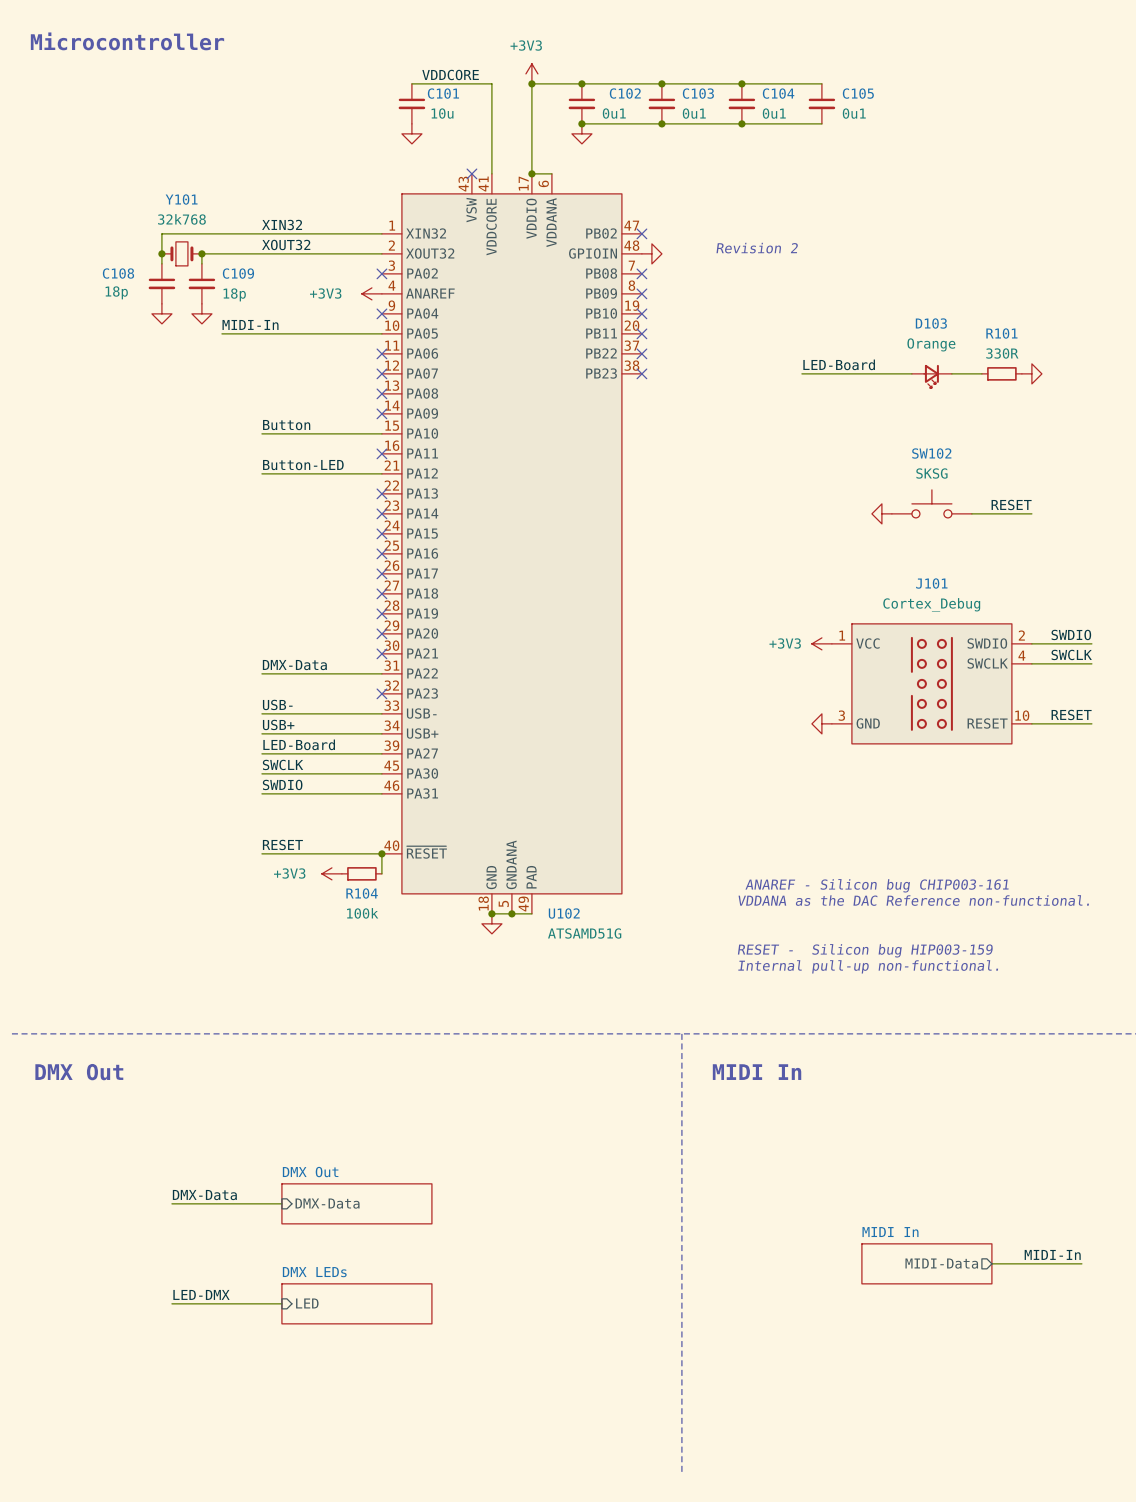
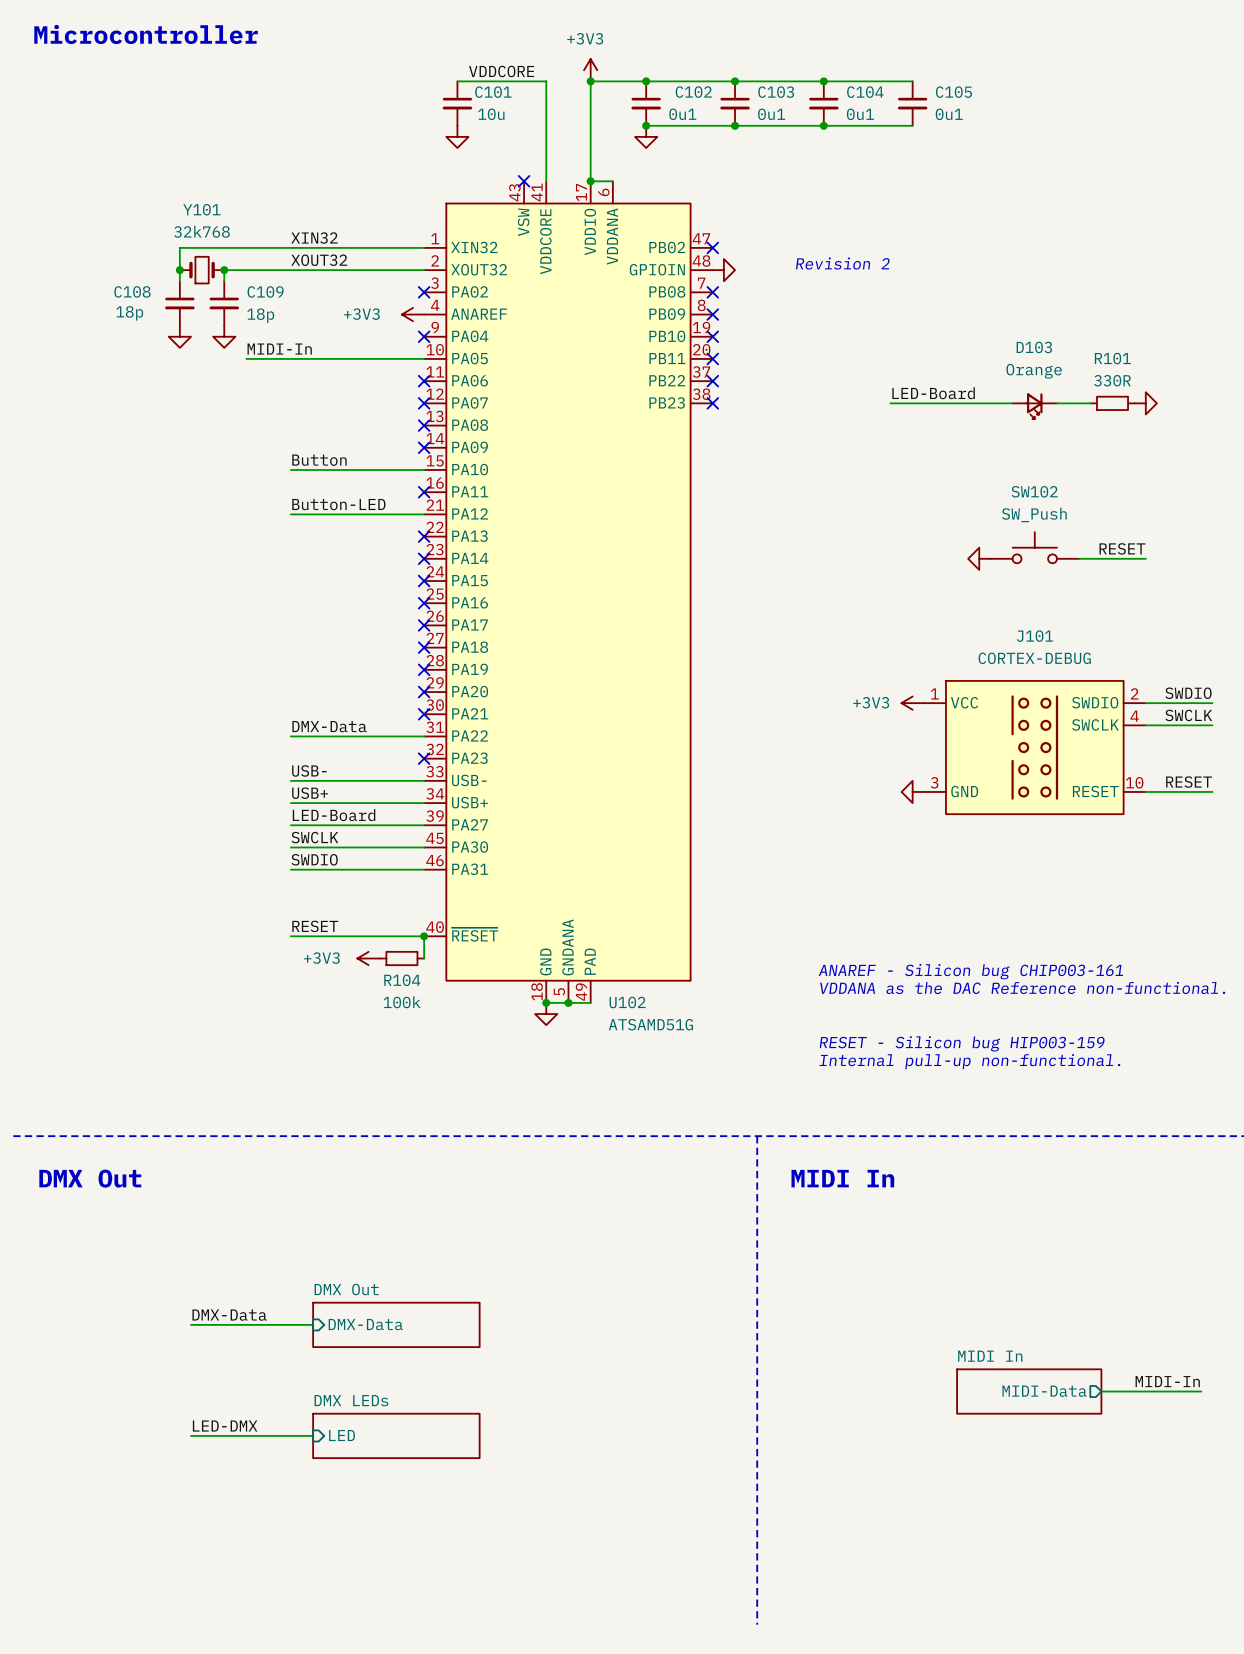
SW102 value: SKSG (931, 473) -> SW_Push (1034, 514)
J101 value: Cortex_Debug (931, 604) -> CORTEX-DEBUG (1034, 658)

